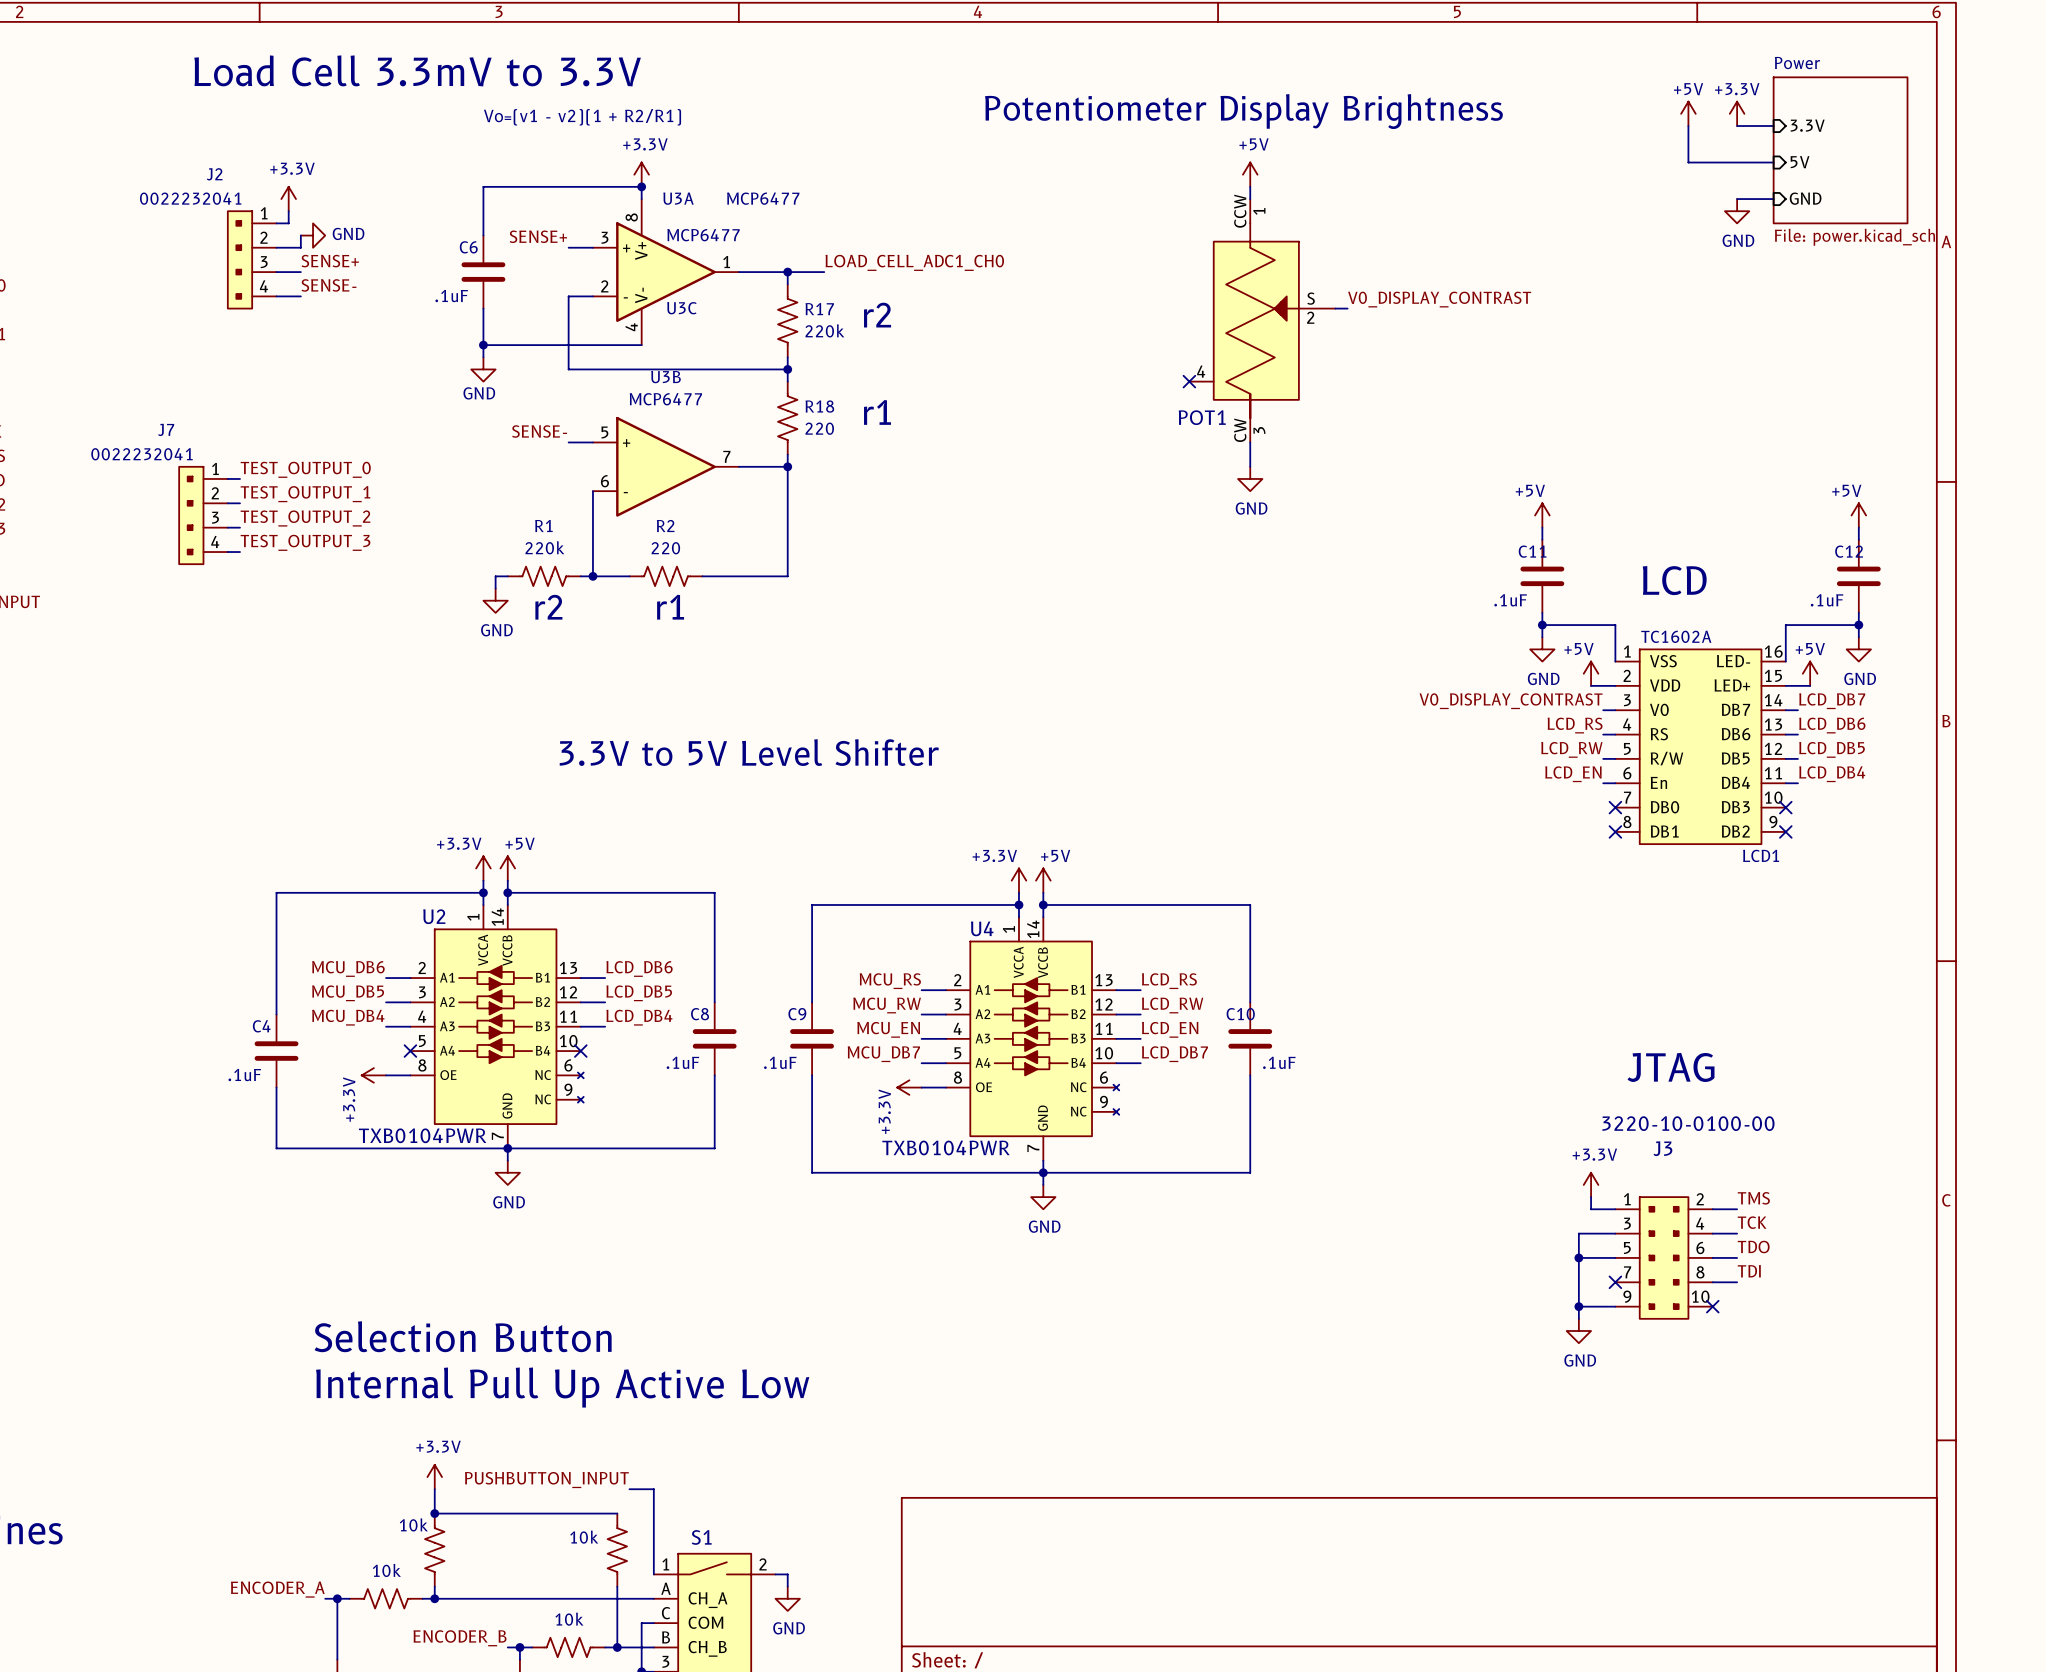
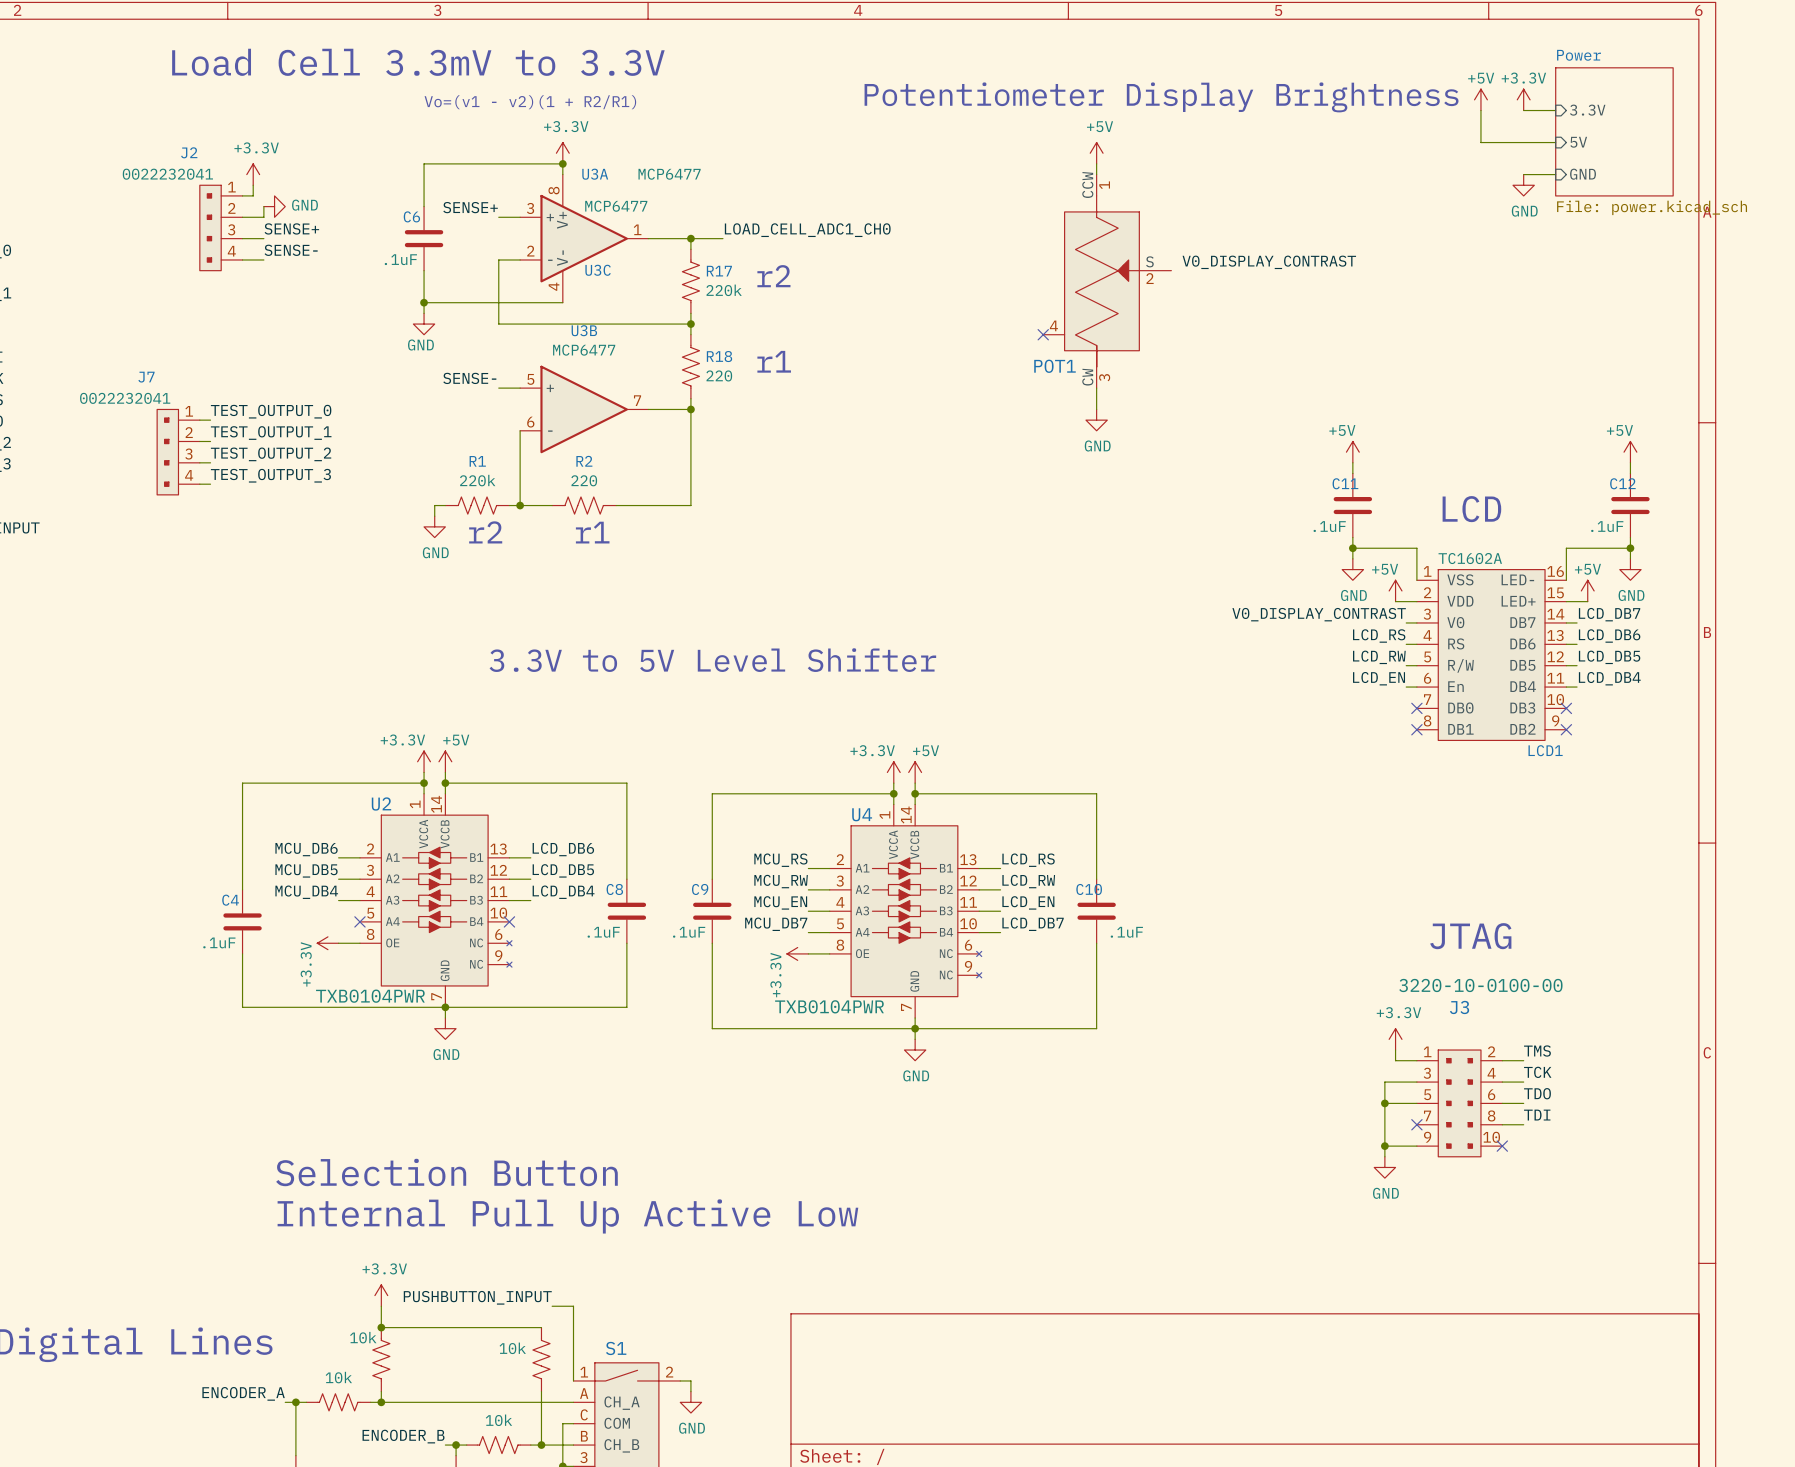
wire: (1335, 308) (1347, 308) -> none

